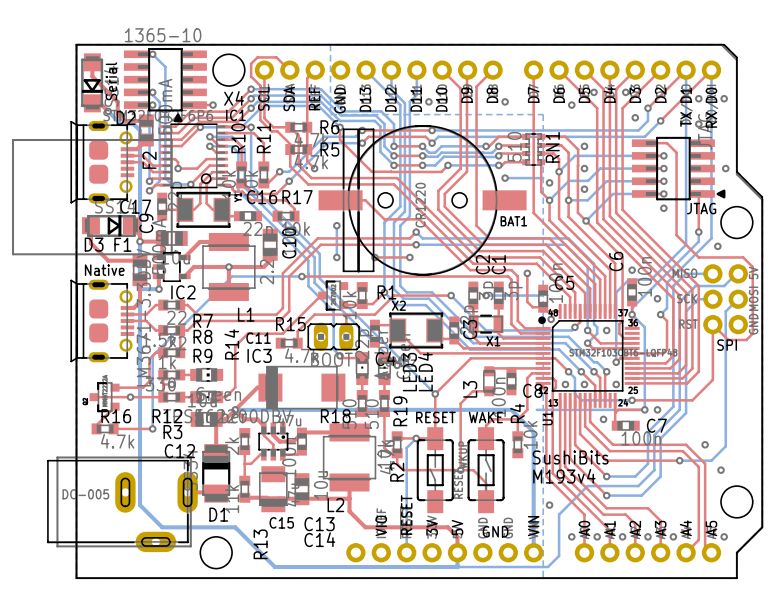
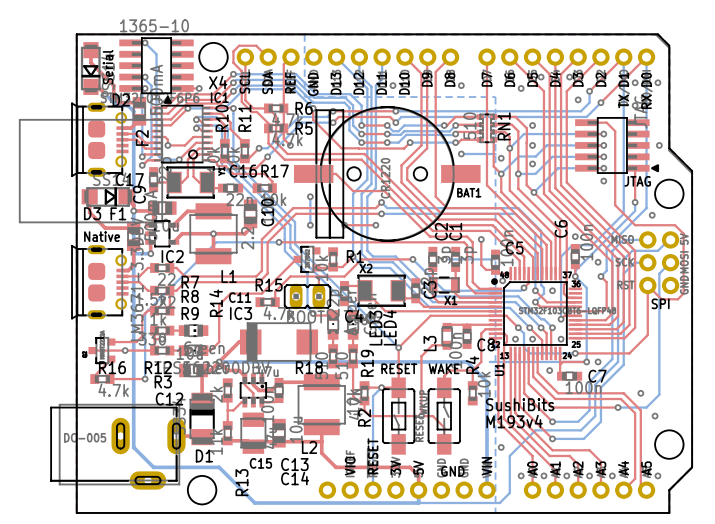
top track: (237, 133) (253, 133) (263, 143) (263, 166) -> (221, 113) (230, 122) (230, 129) (244, 143)
via: (209, 136) -> none
via: none -> (196, 119)
via: (209, 146) -> none
via: none -> (196, 128)

